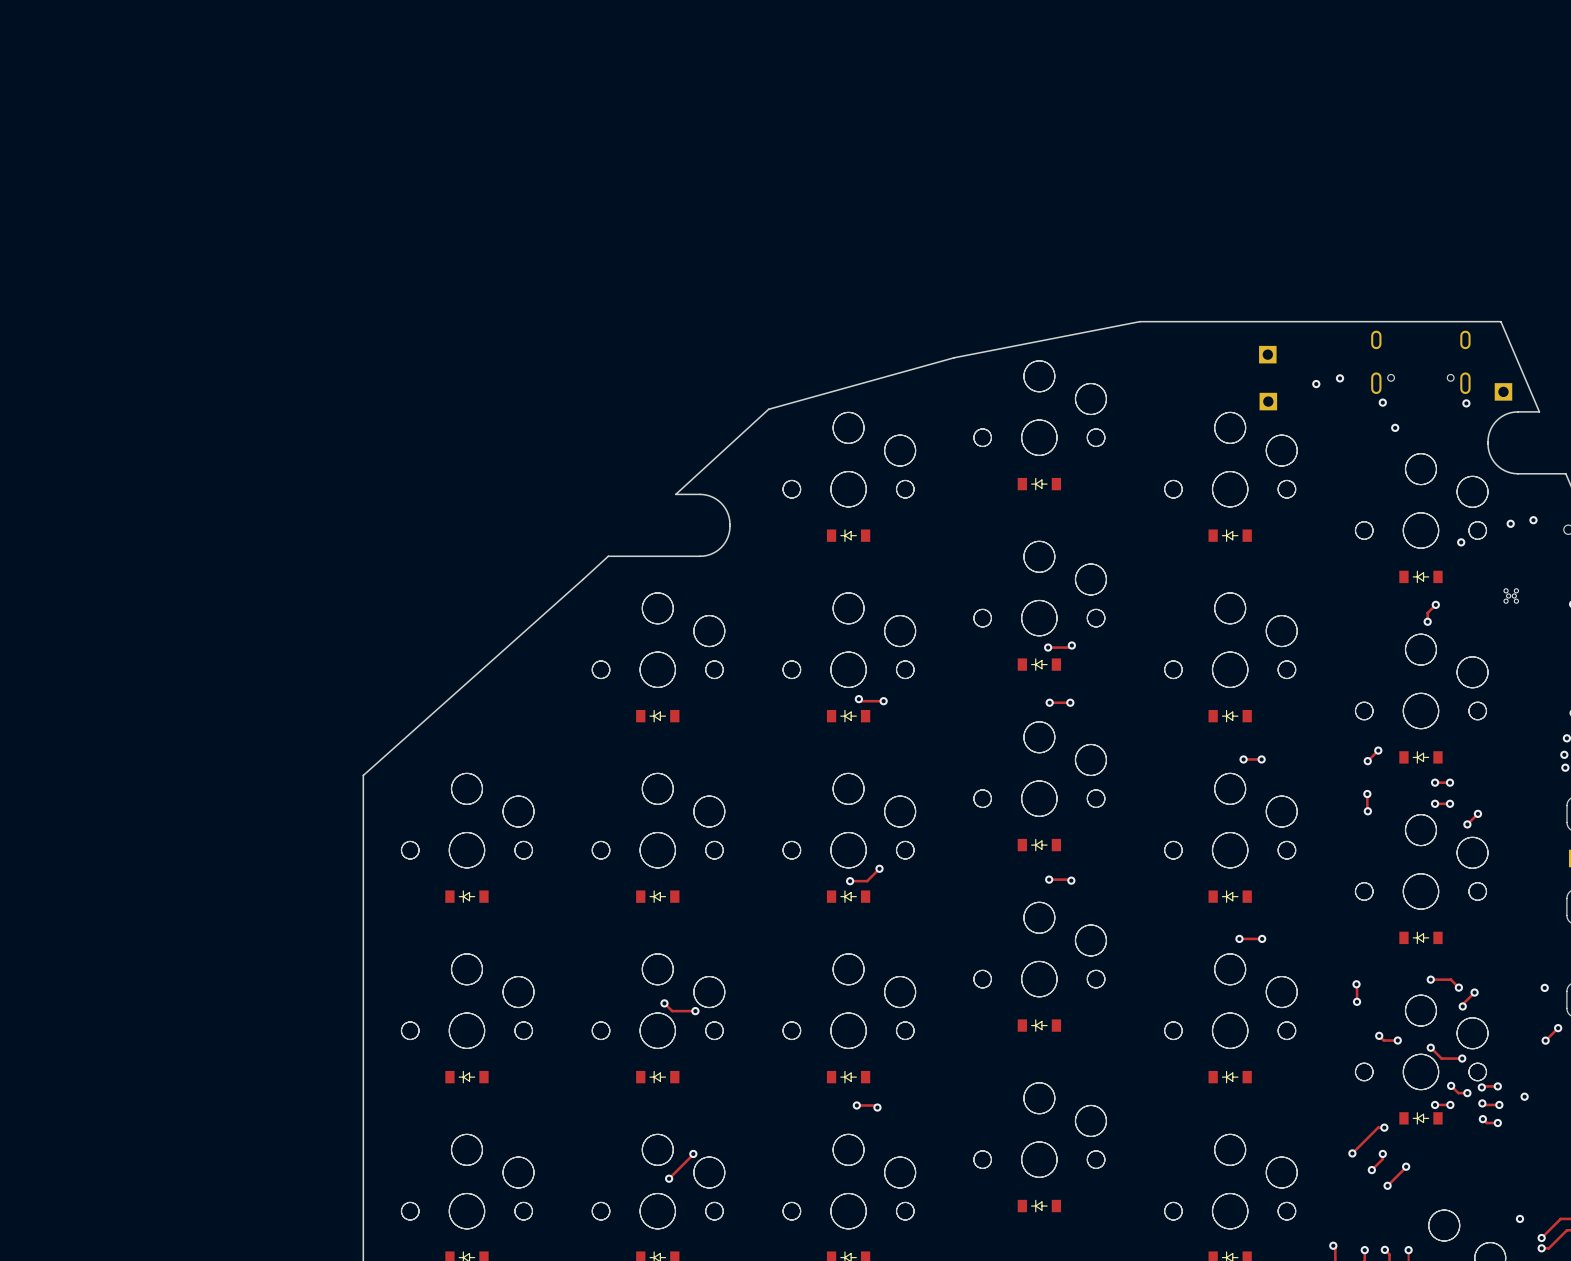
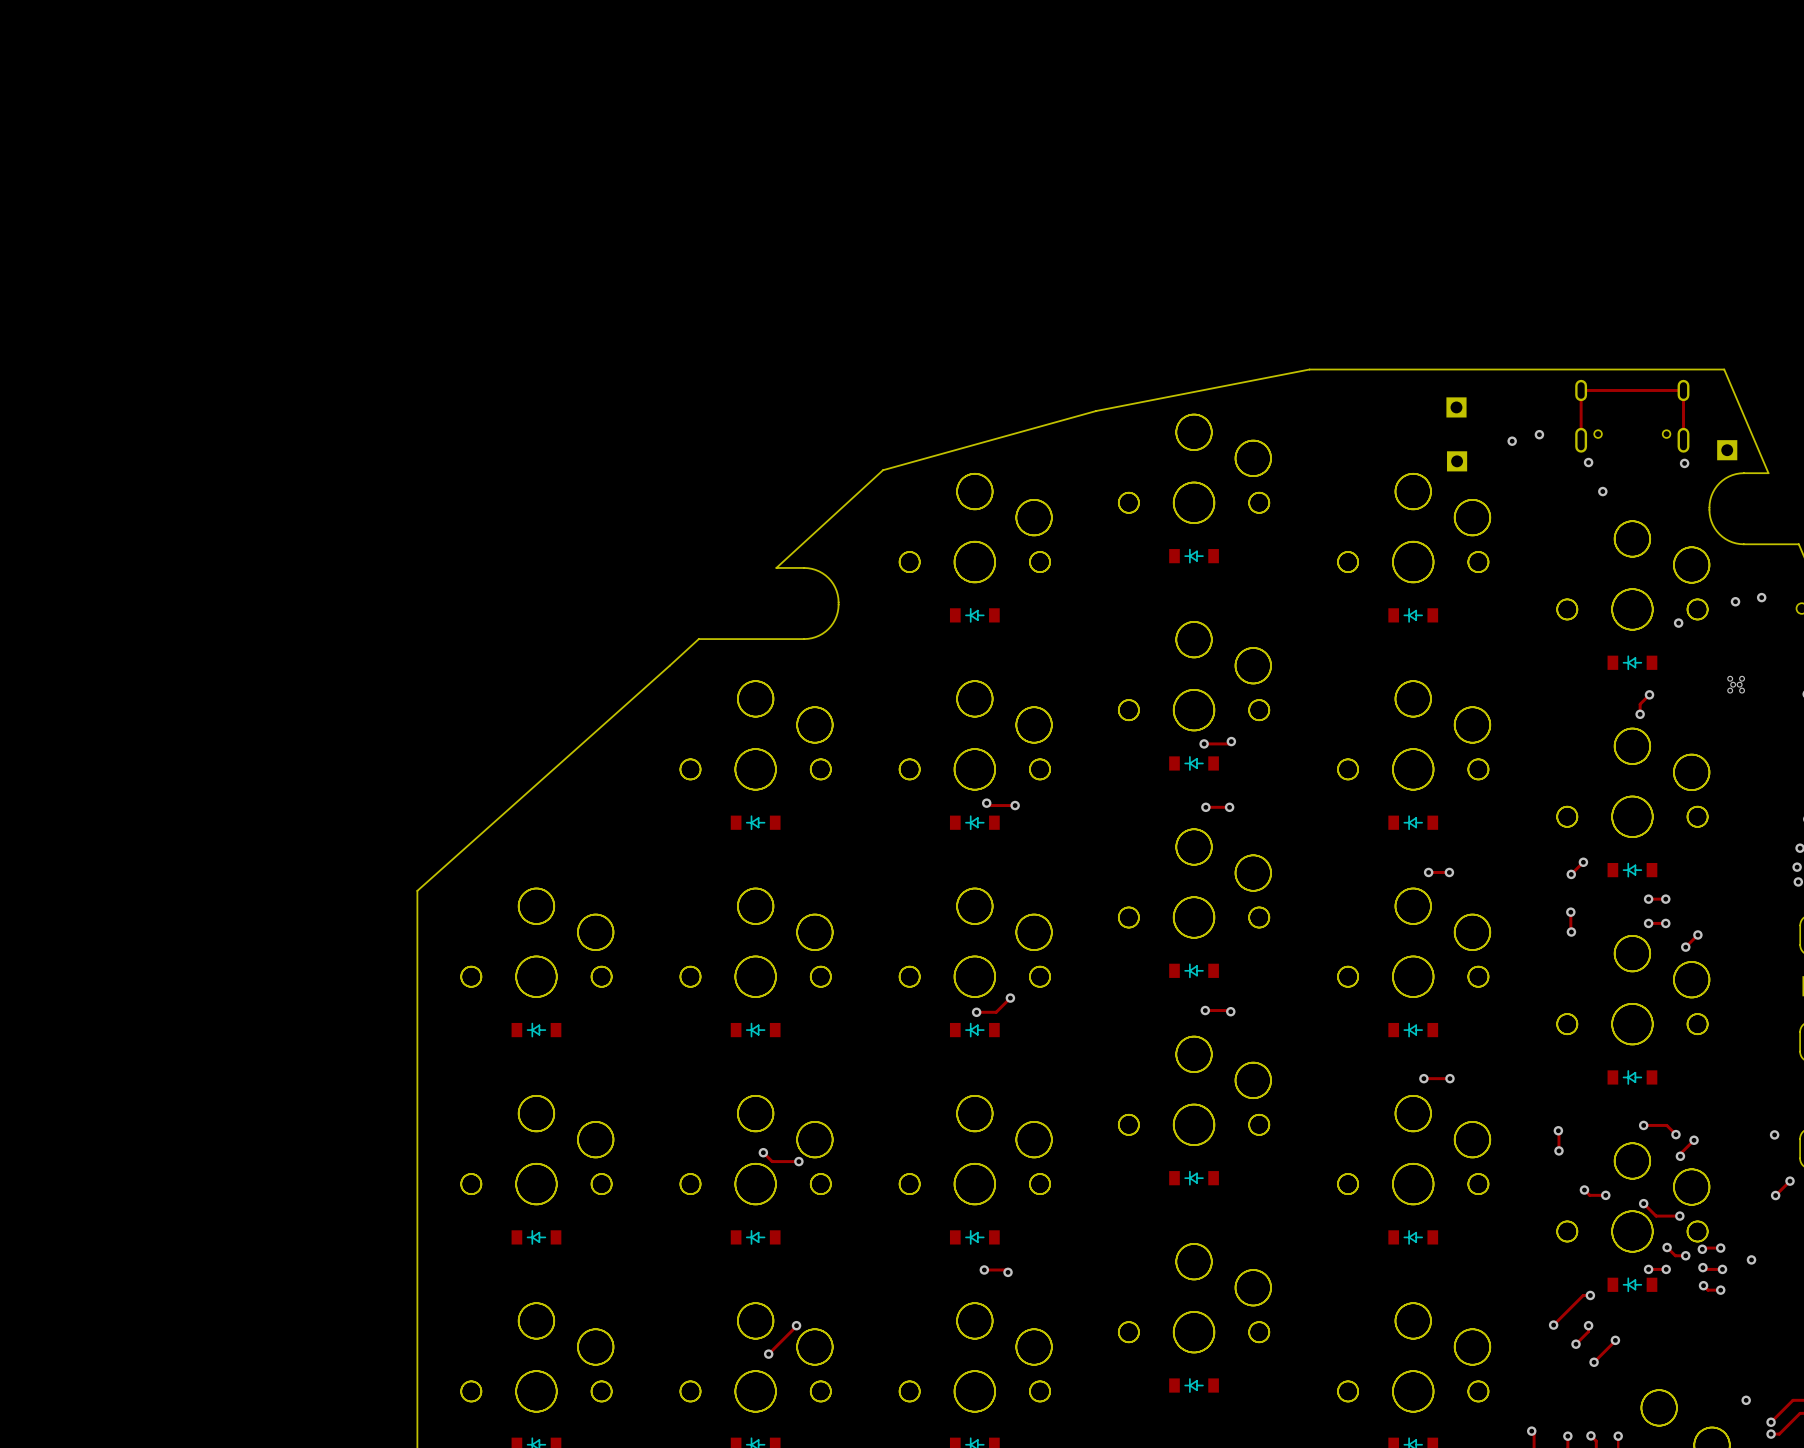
track: none -> (1581, 440) (1581, 390) (1683, 390) (1683, 440)

